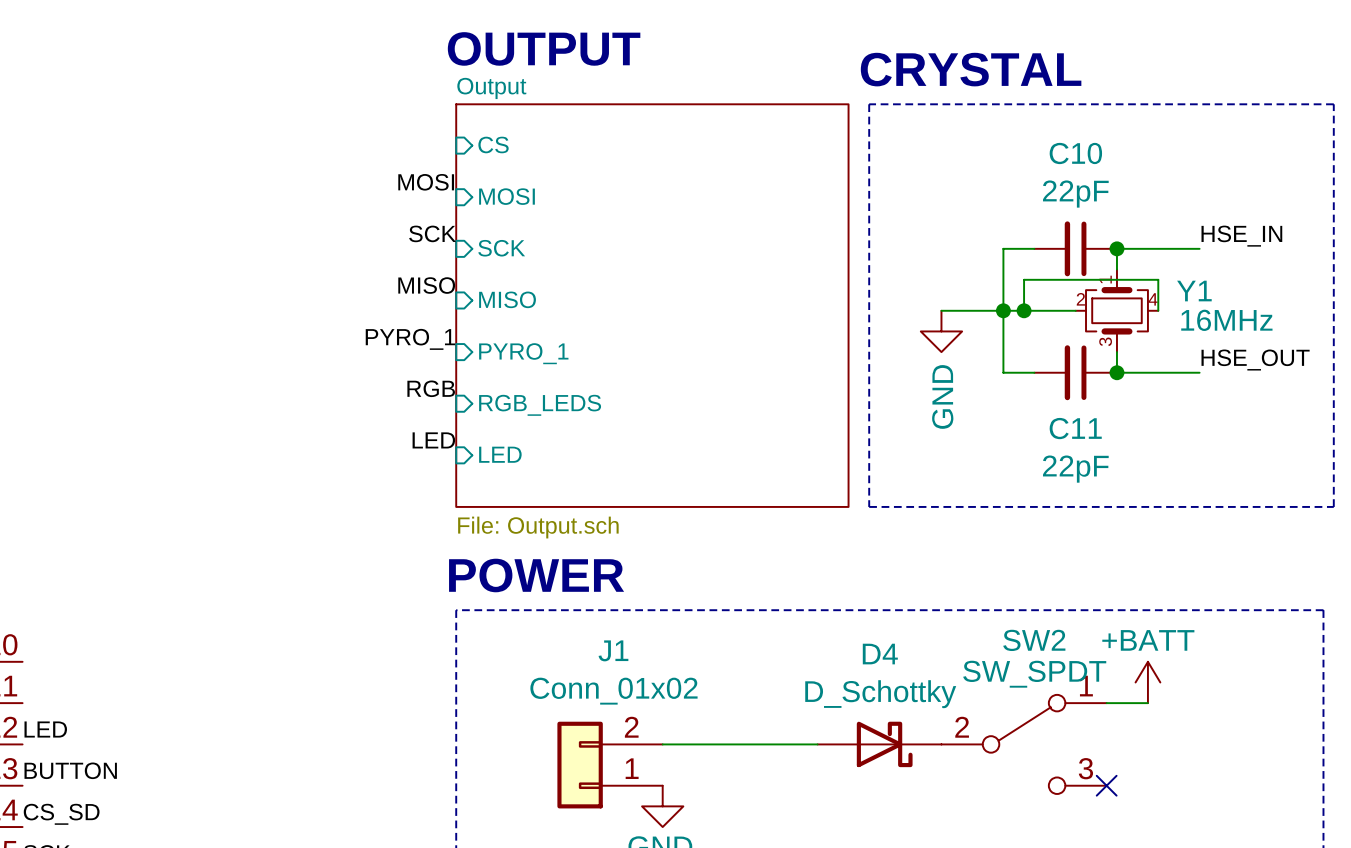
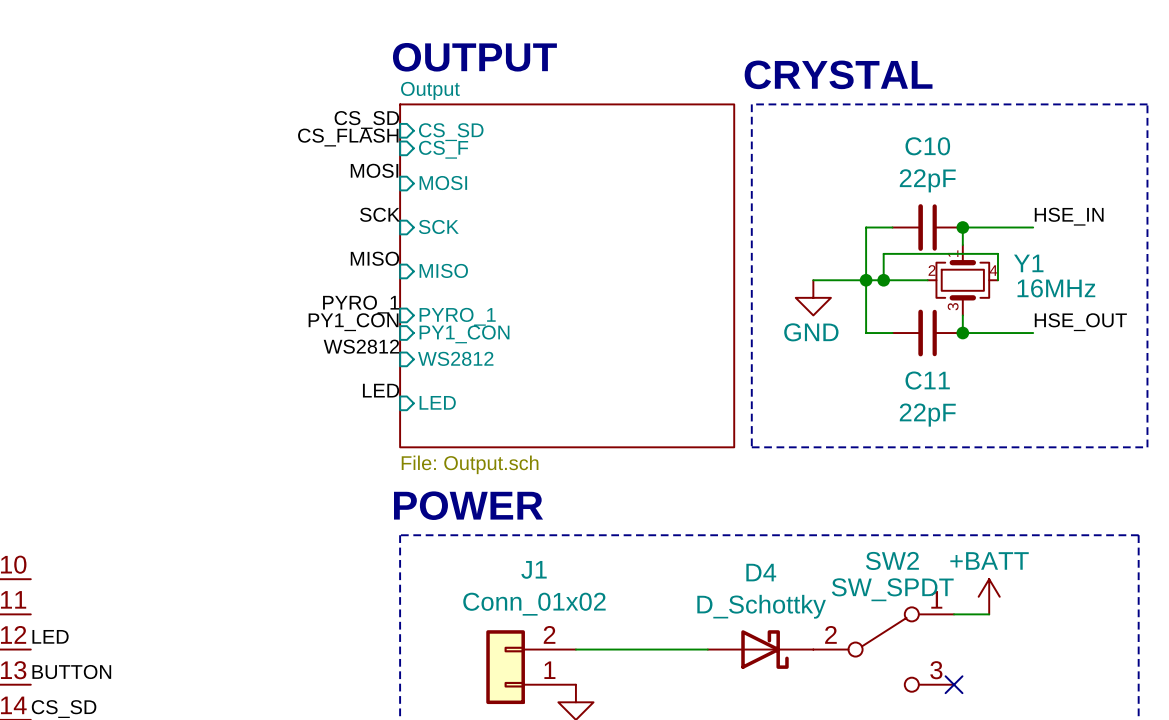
label: none -> CS_SD (366, 119)
sheet pin: none -> CS_SD (451, 132)
label: none -> CS_FLASH (348, 137)
sheet pin: CS (493, 144) -> CS_F (443, 149)
label: none -> PY1_CON (353, 322)
sheet pin: none -> PY1_CON (464, 334)
label: RGB (431, 388) -> WS2812 (361, 346)
power symbol text rotation: 0° (942, 396) -> 90° clockwise (811, 332)
sheet pin: RGB_LEDS (540, 405) -> WS2812 (455, 358)

